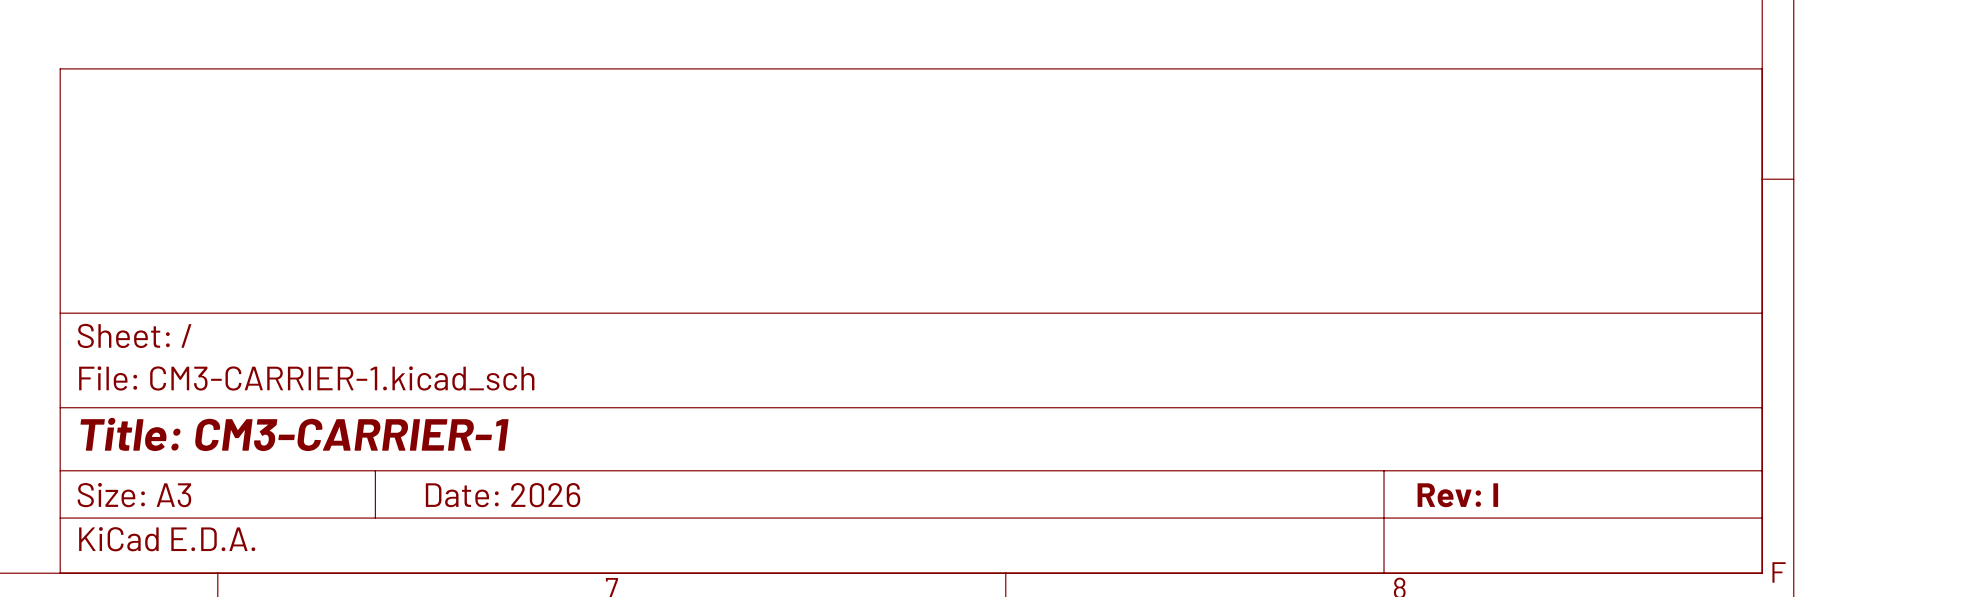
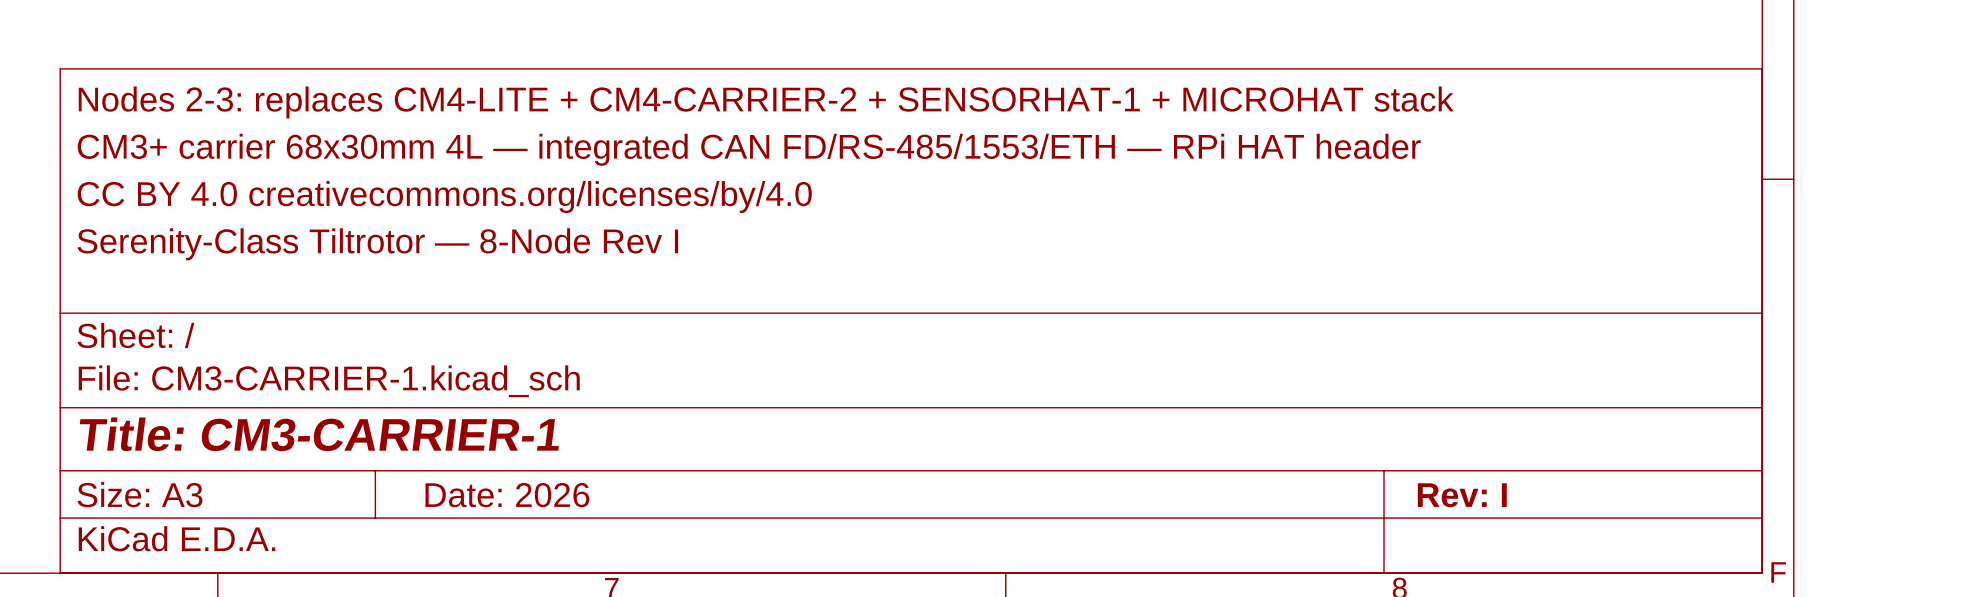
title block: none -> Nodes 2-3: replaces CM4-LITE + CM4-CARRIER-2 + SENSORHAT-1 + MICROHAT stack (766, 102)
title block: none -> CM3+ carrier 68x30mm 4L — integrated CAN FD/RS-485/1553/ETH — RPi HAT header (749, 149)
title block: none -> CC BY 4.0 creativecommons.org/licenses/by/4.0 (444, 197)
title block: none -> Serenity-Class Tiltrotor — 8-Node Rev I (377, 244)

